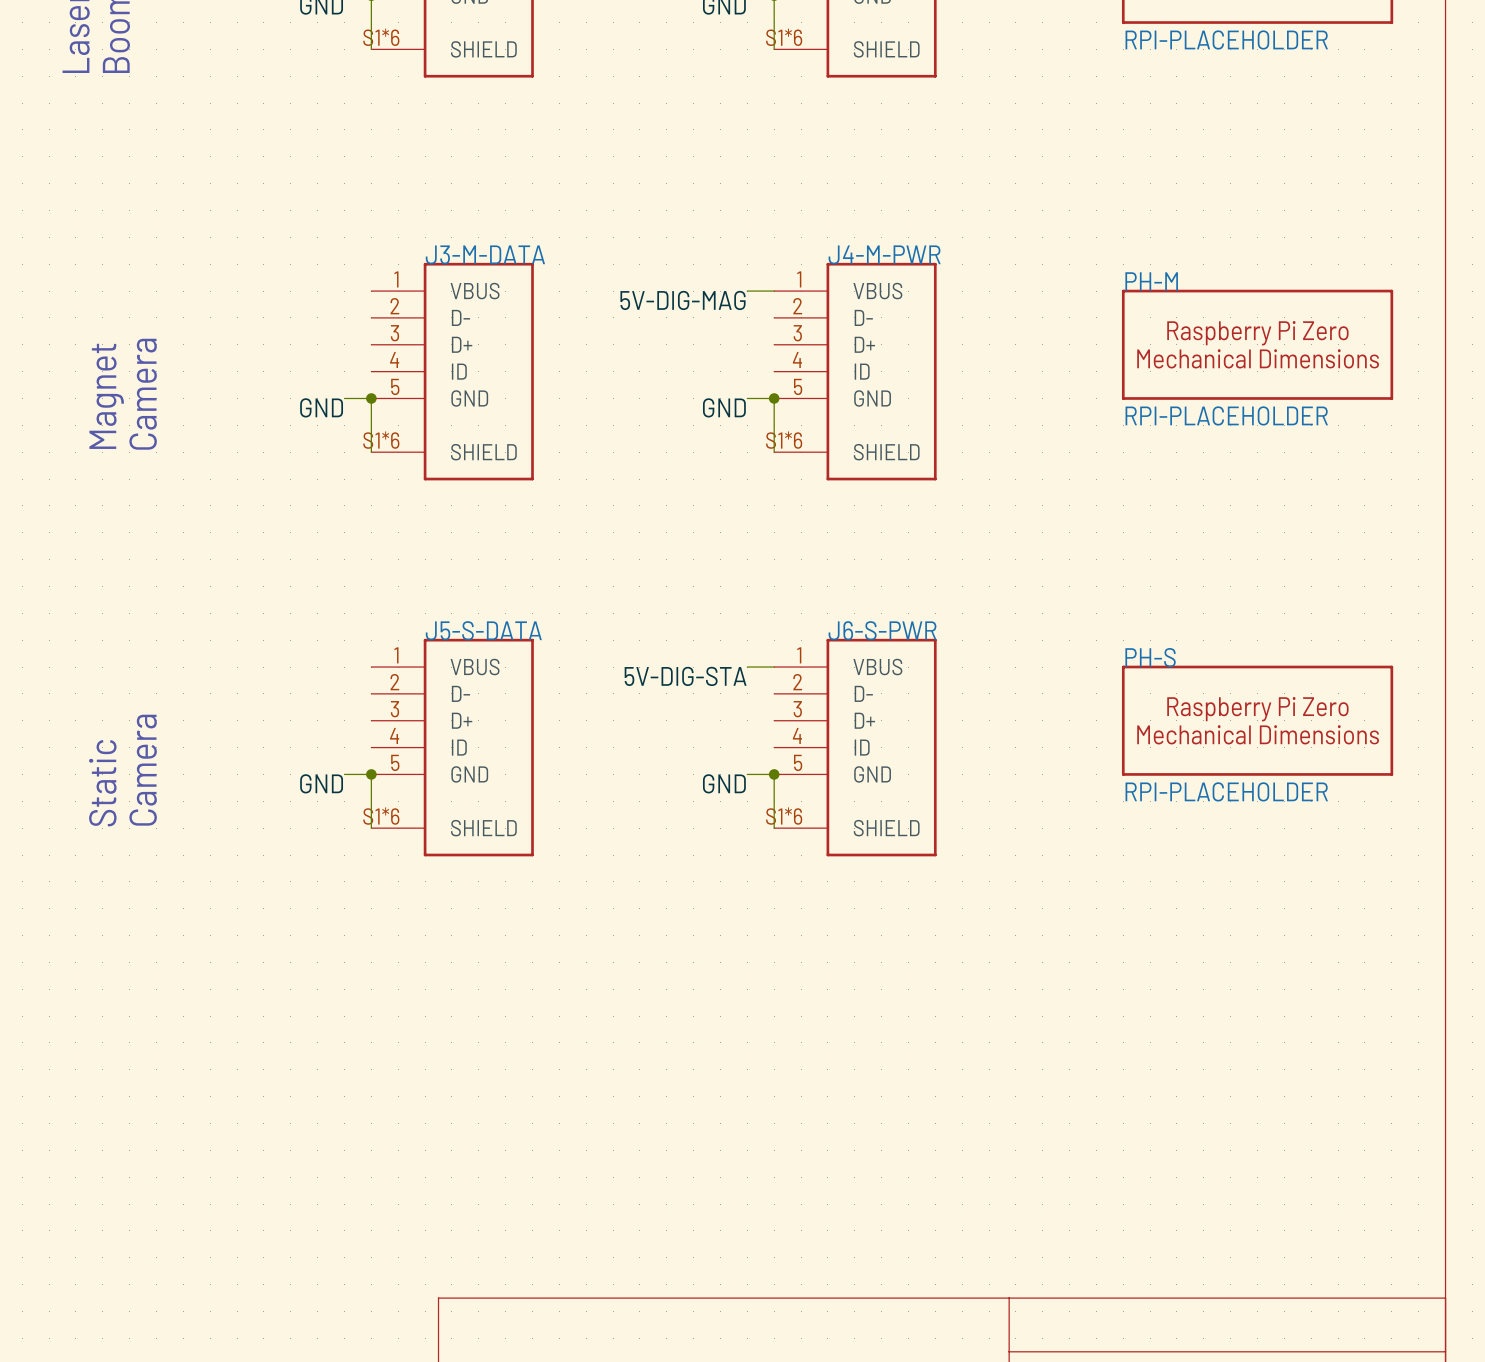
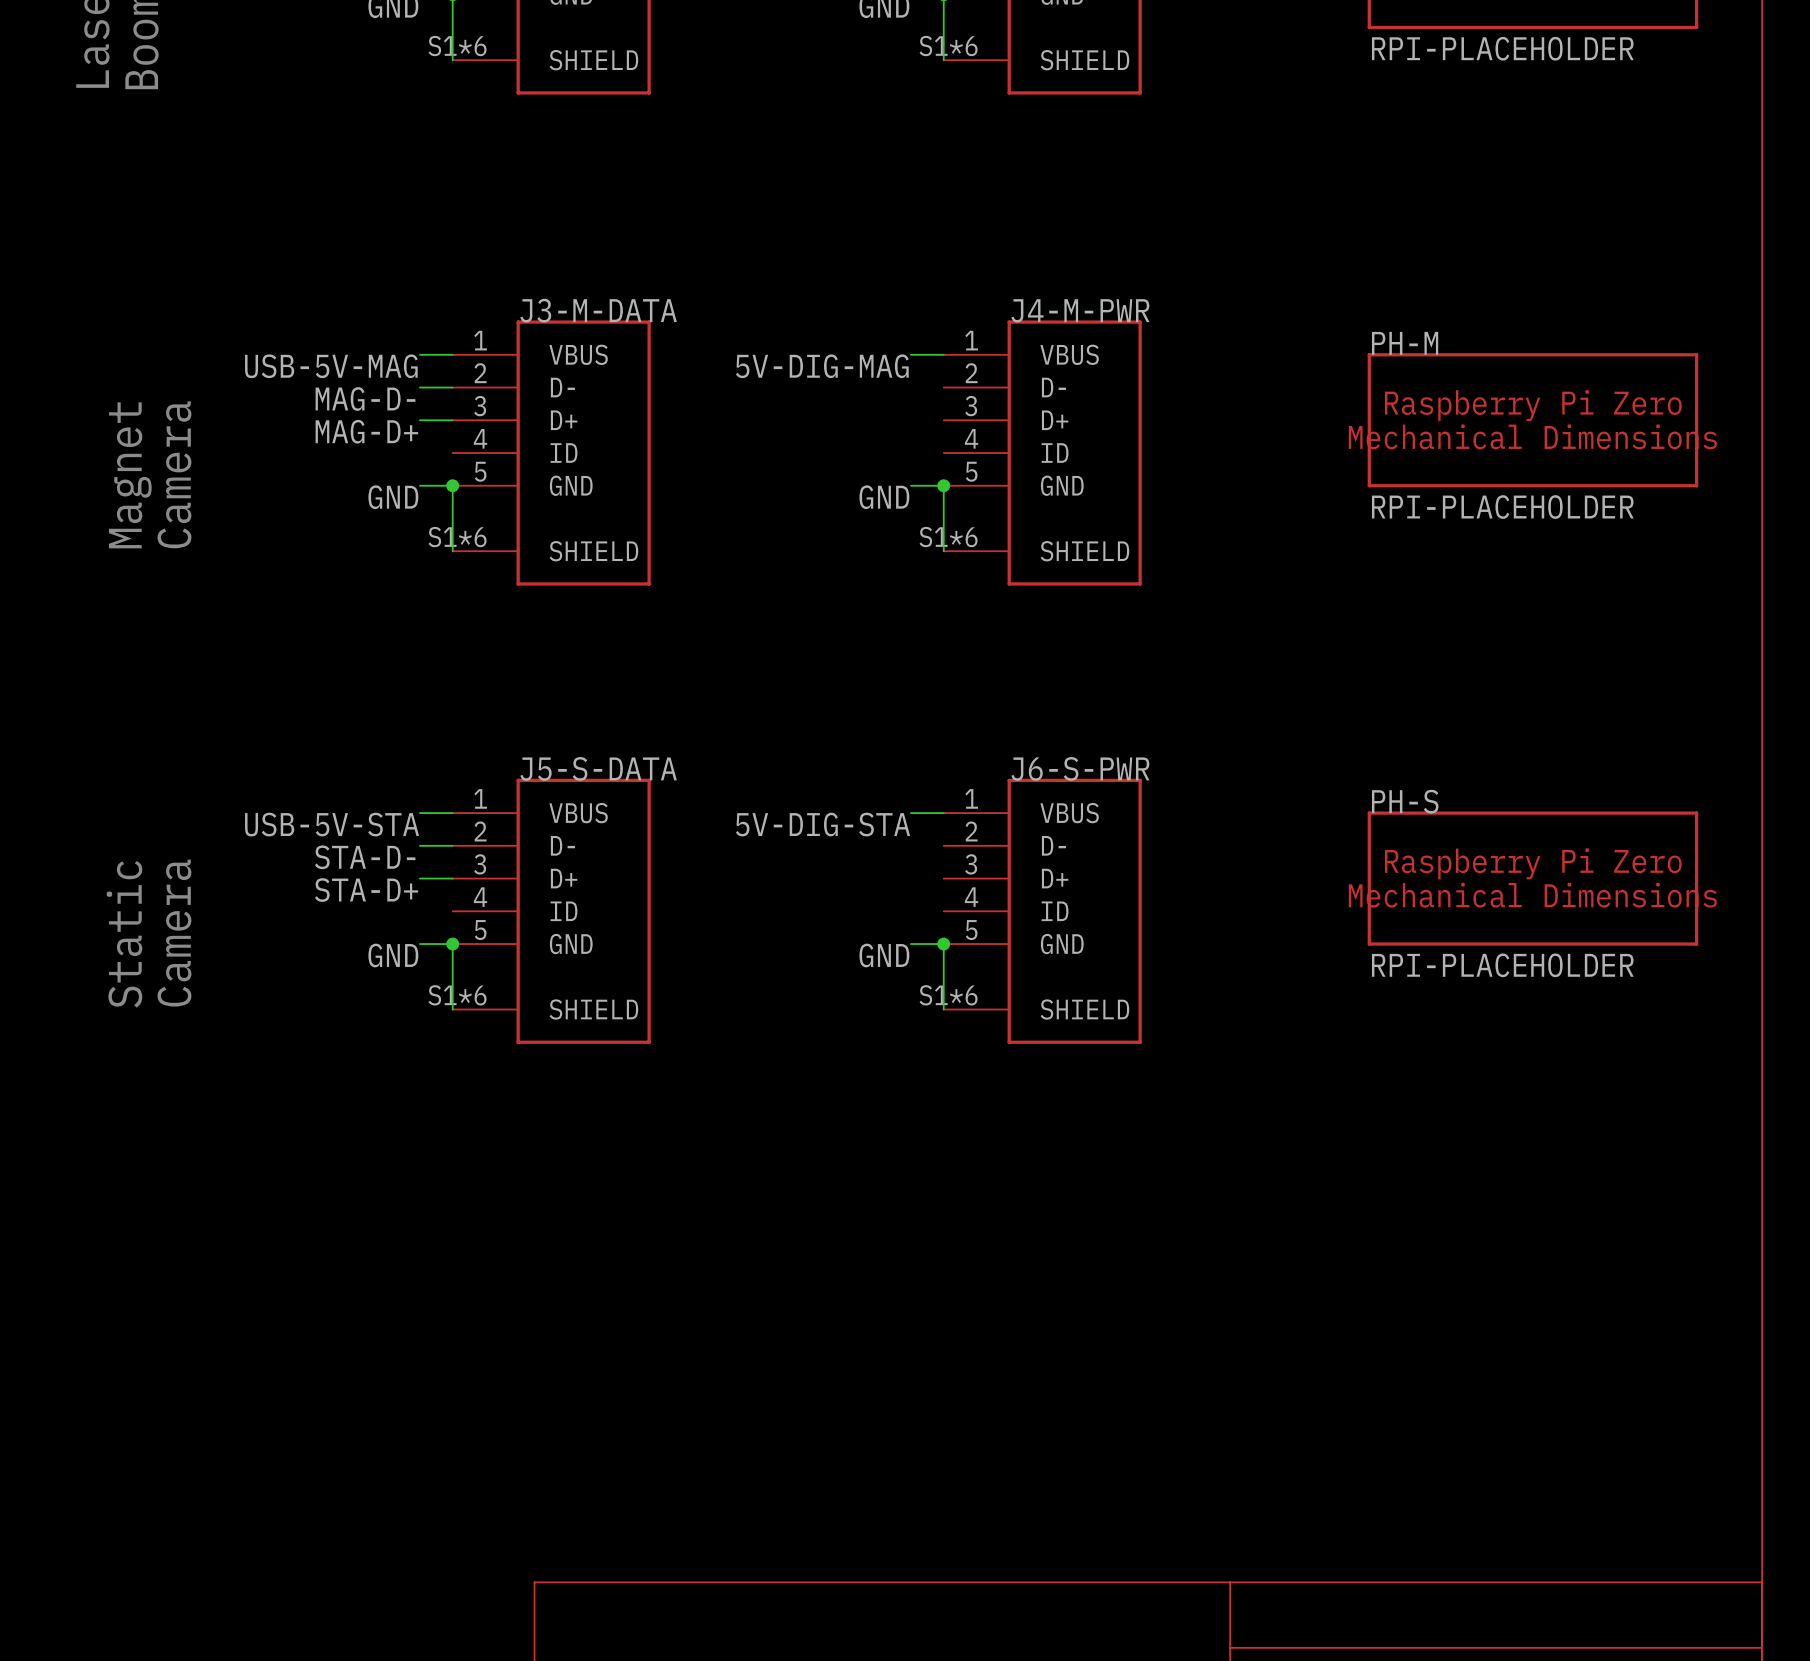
wire: none -> (419, 354) (452, 354)
label: none -> USB-5V-MAG (331, 366)
wire: none -> (419, 387) (452, 387)
label: none -> MAG-D- (365, 399)
wire: none -> (419, 420) (452, 420)
label: none -> MAG-D+ (366, 431)
wire: none -> (419, 813) (452, 813)
label: none -> USB-5V-STA (332, 824)
wire: none -> (419, 845) (452, 845)
label: none -> STA-D- (365, 857)
wire: none -> (419, 878) (452, 878)
label: none -> STA-D+ (366, 890)

